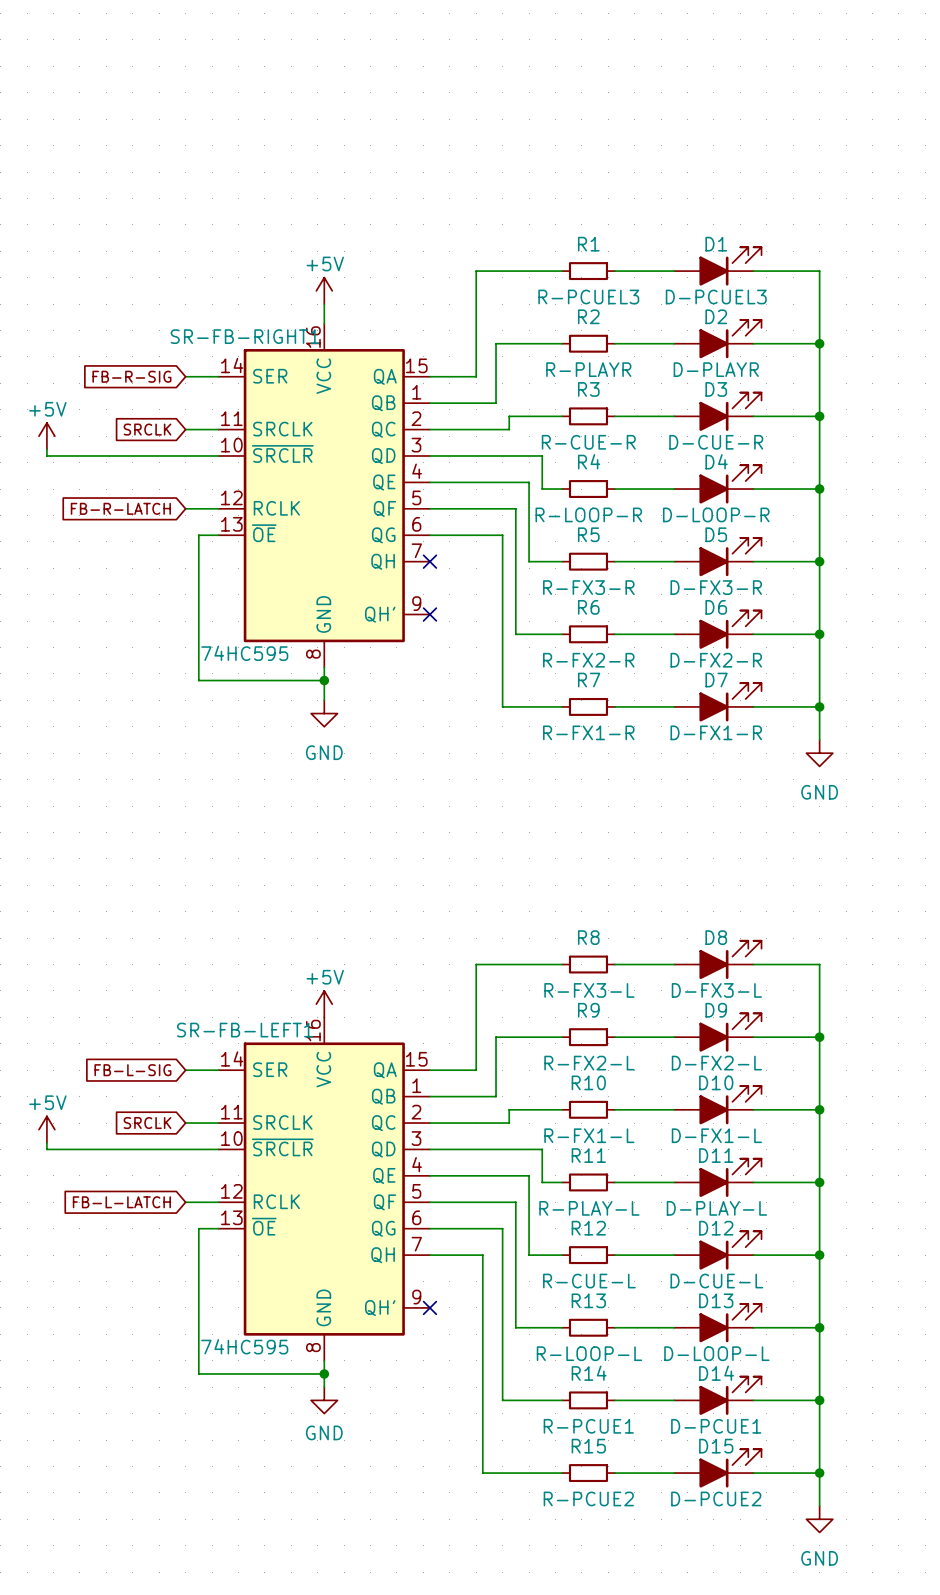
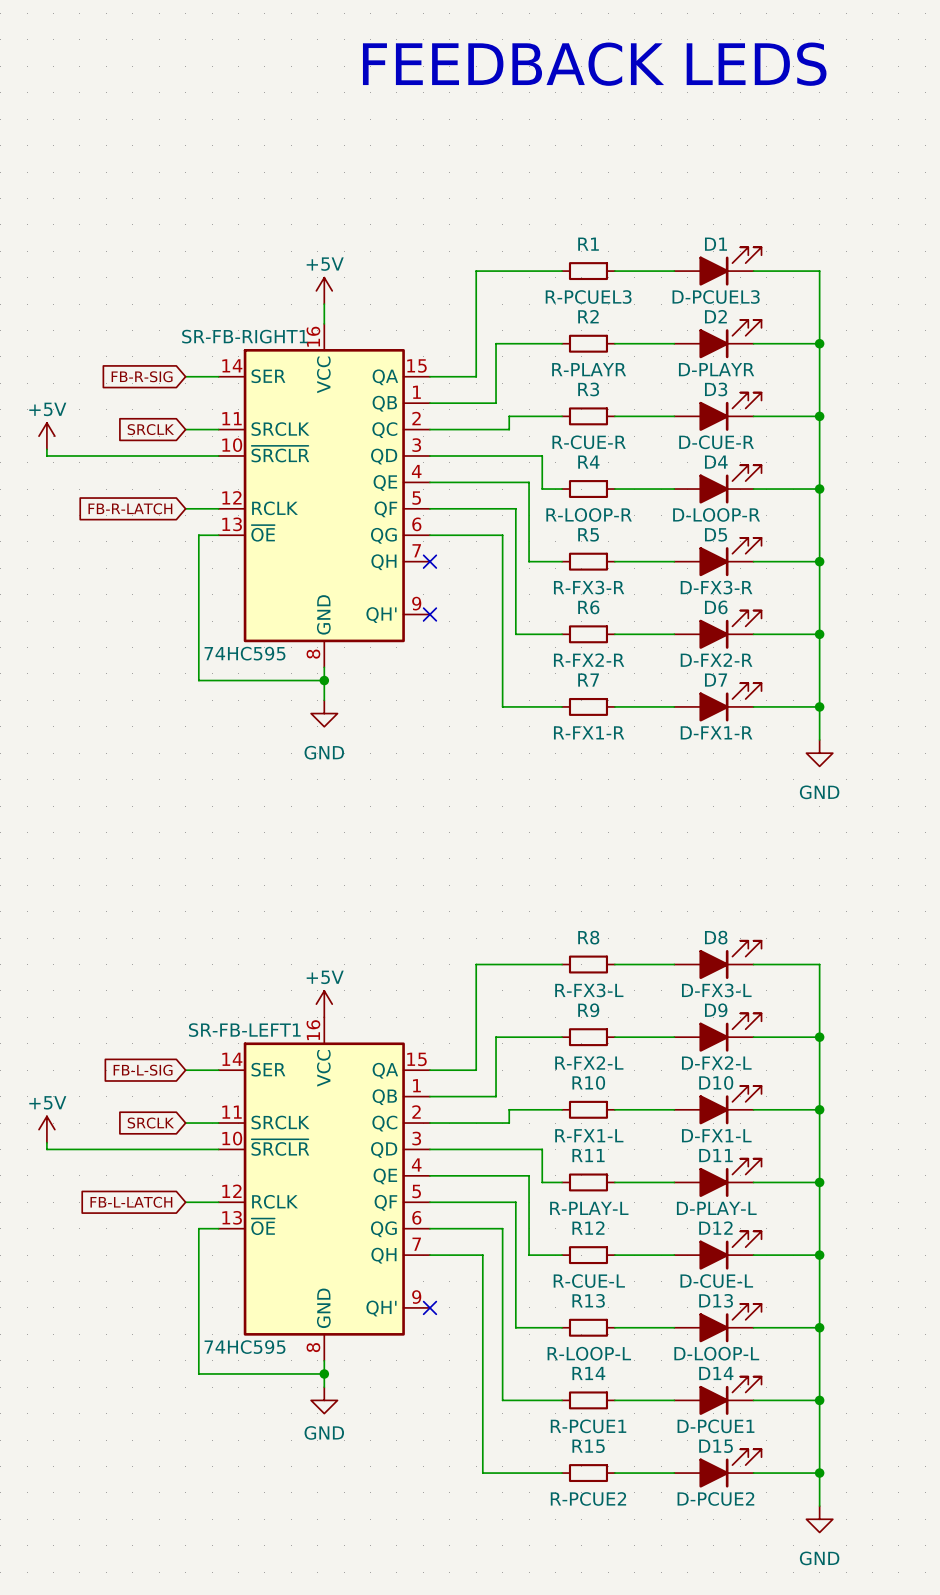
text: none -> FEEDBACK LEDS (594, 64)

